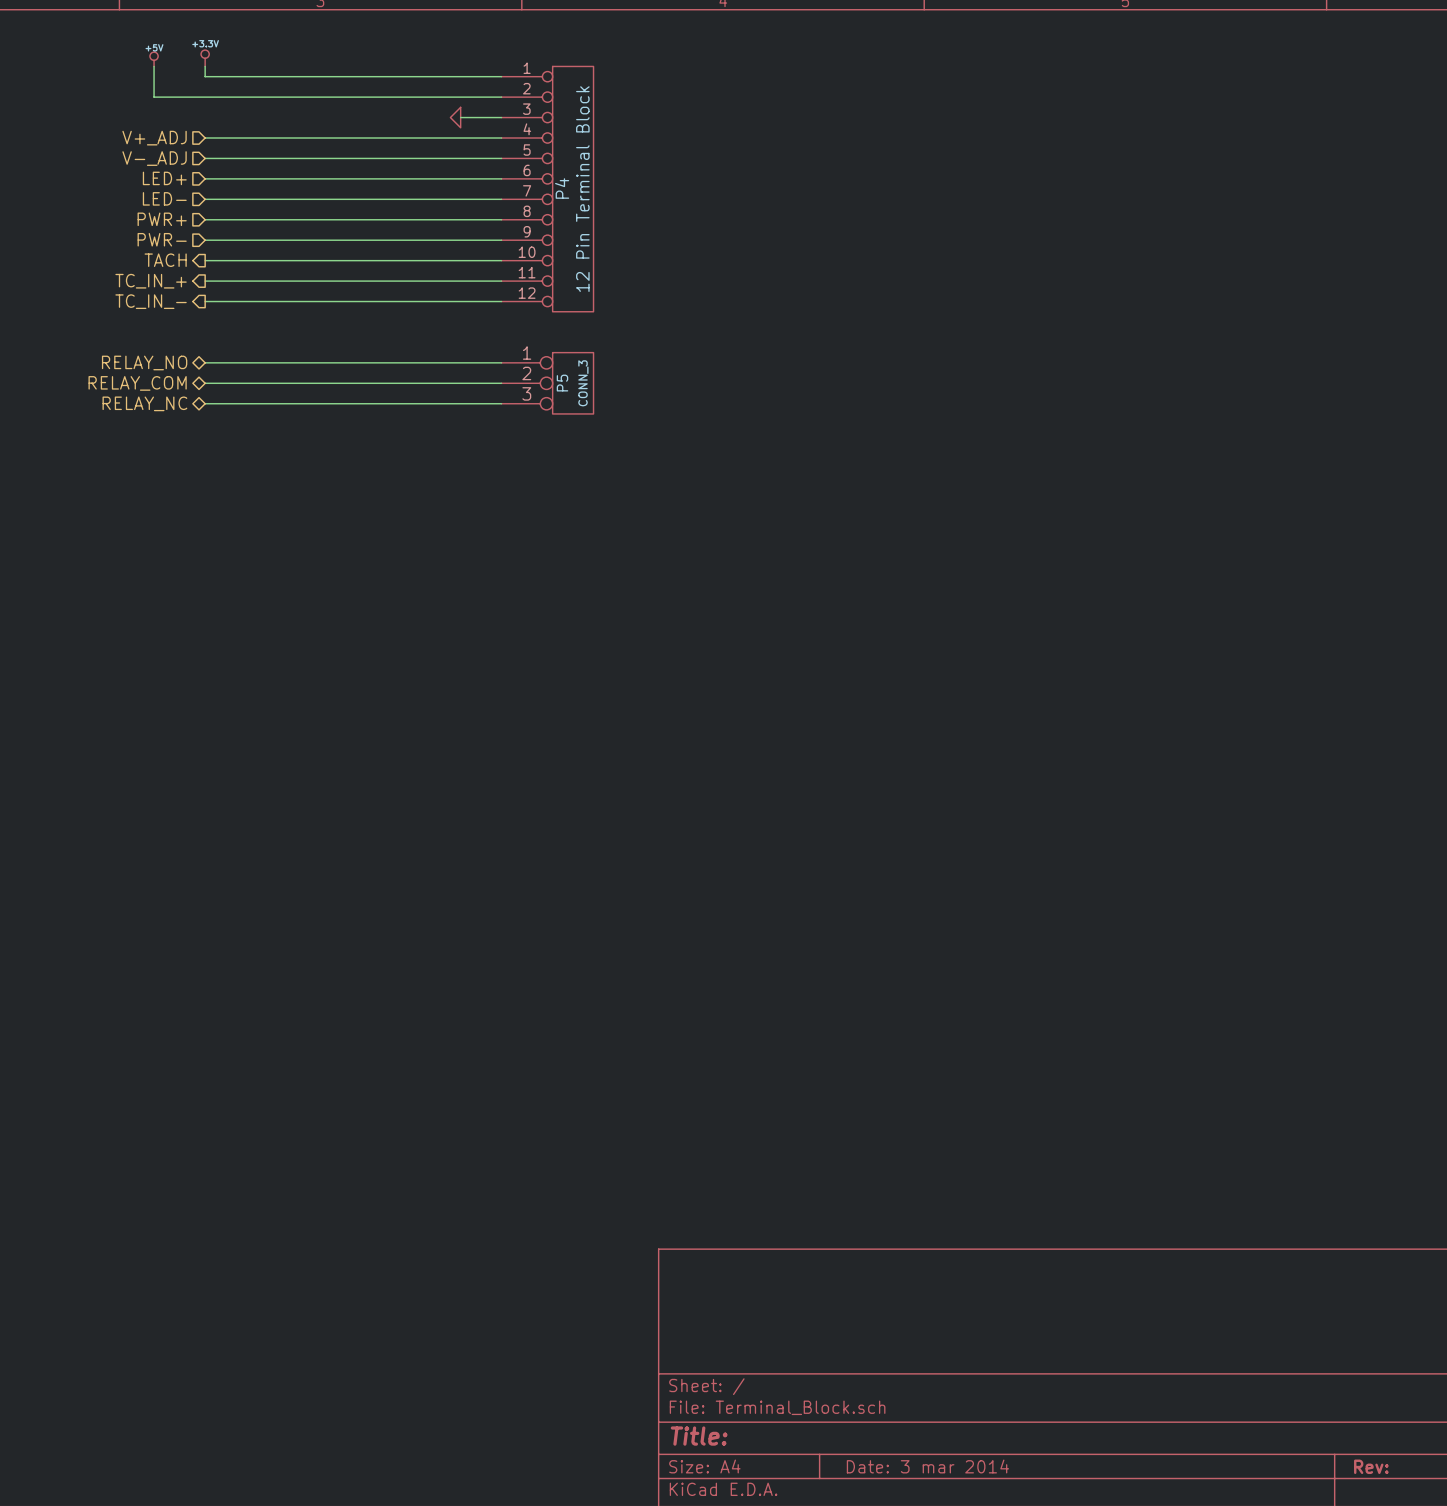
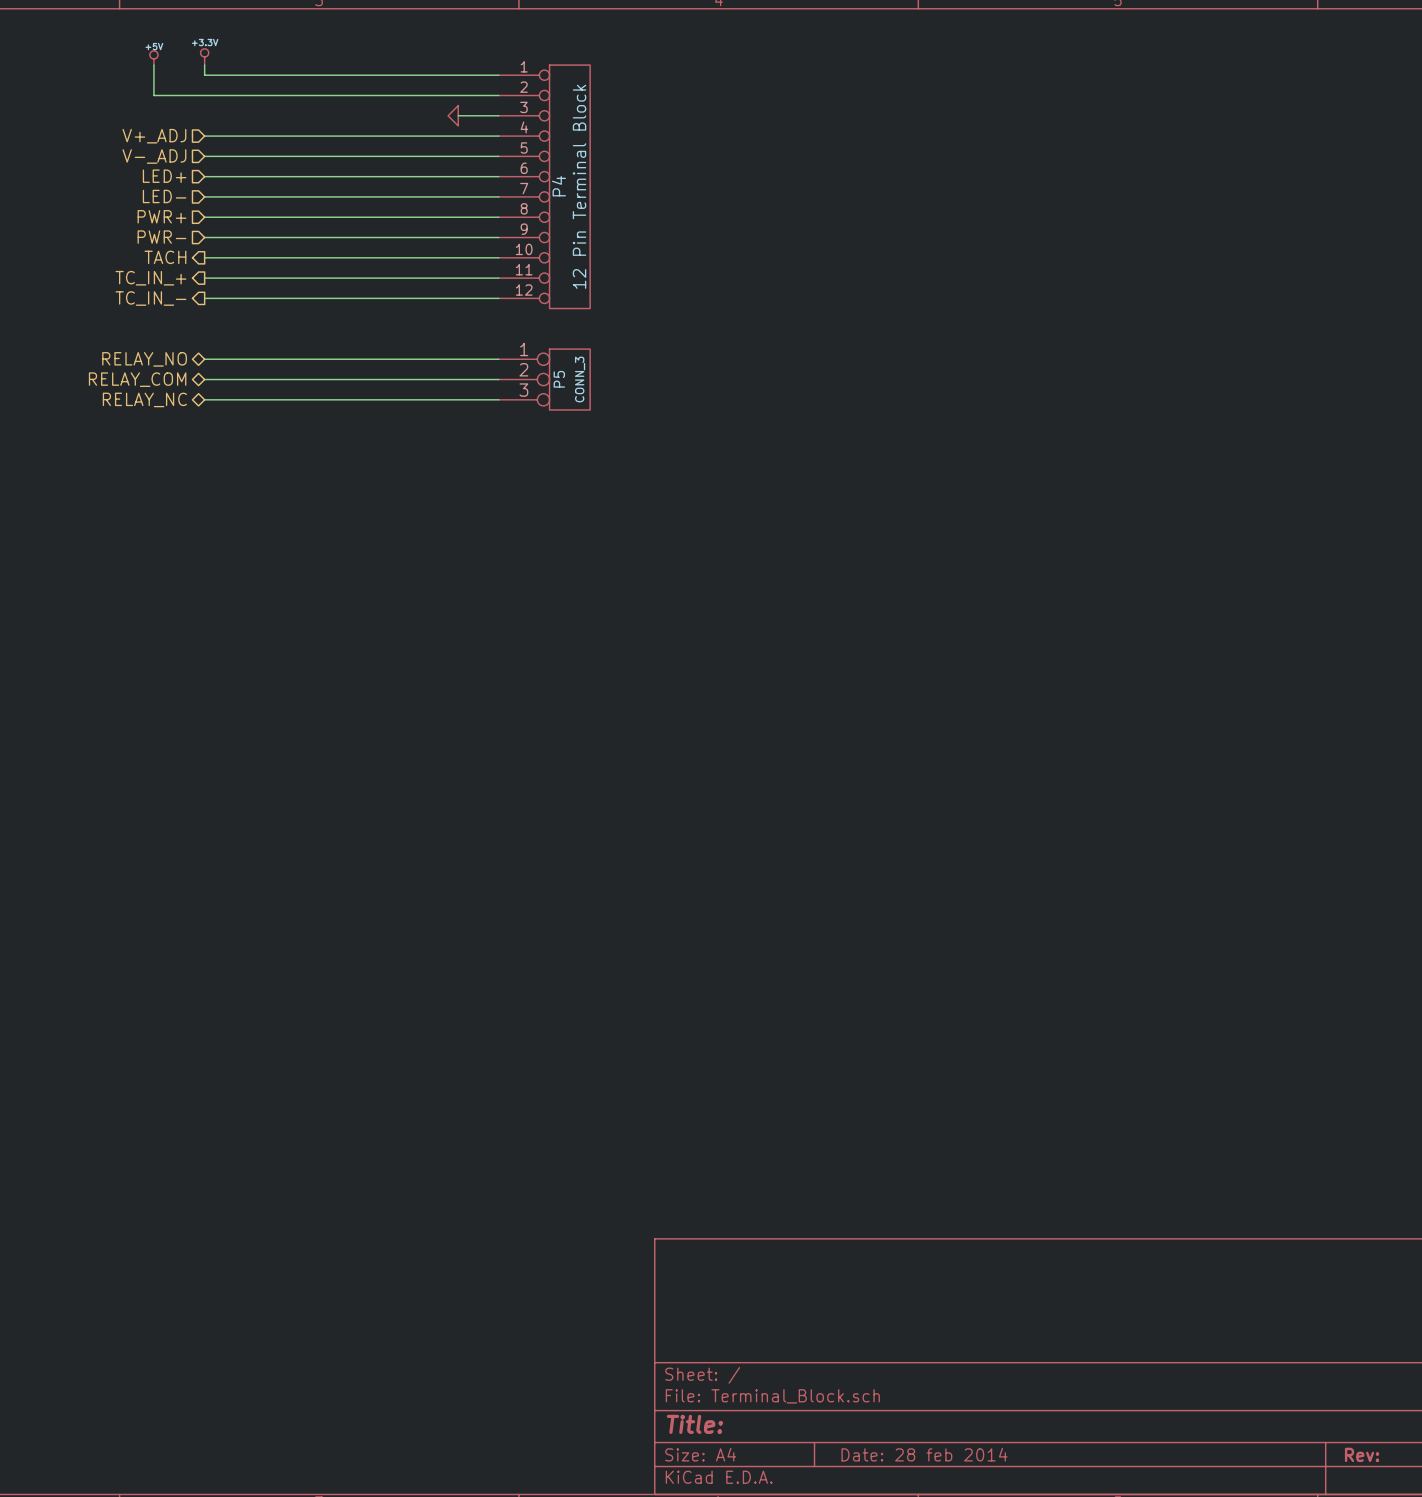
title block: Date: 3 mar 2014 (927, 1466) -> Date: 28 feb 2014 (924, 1454)

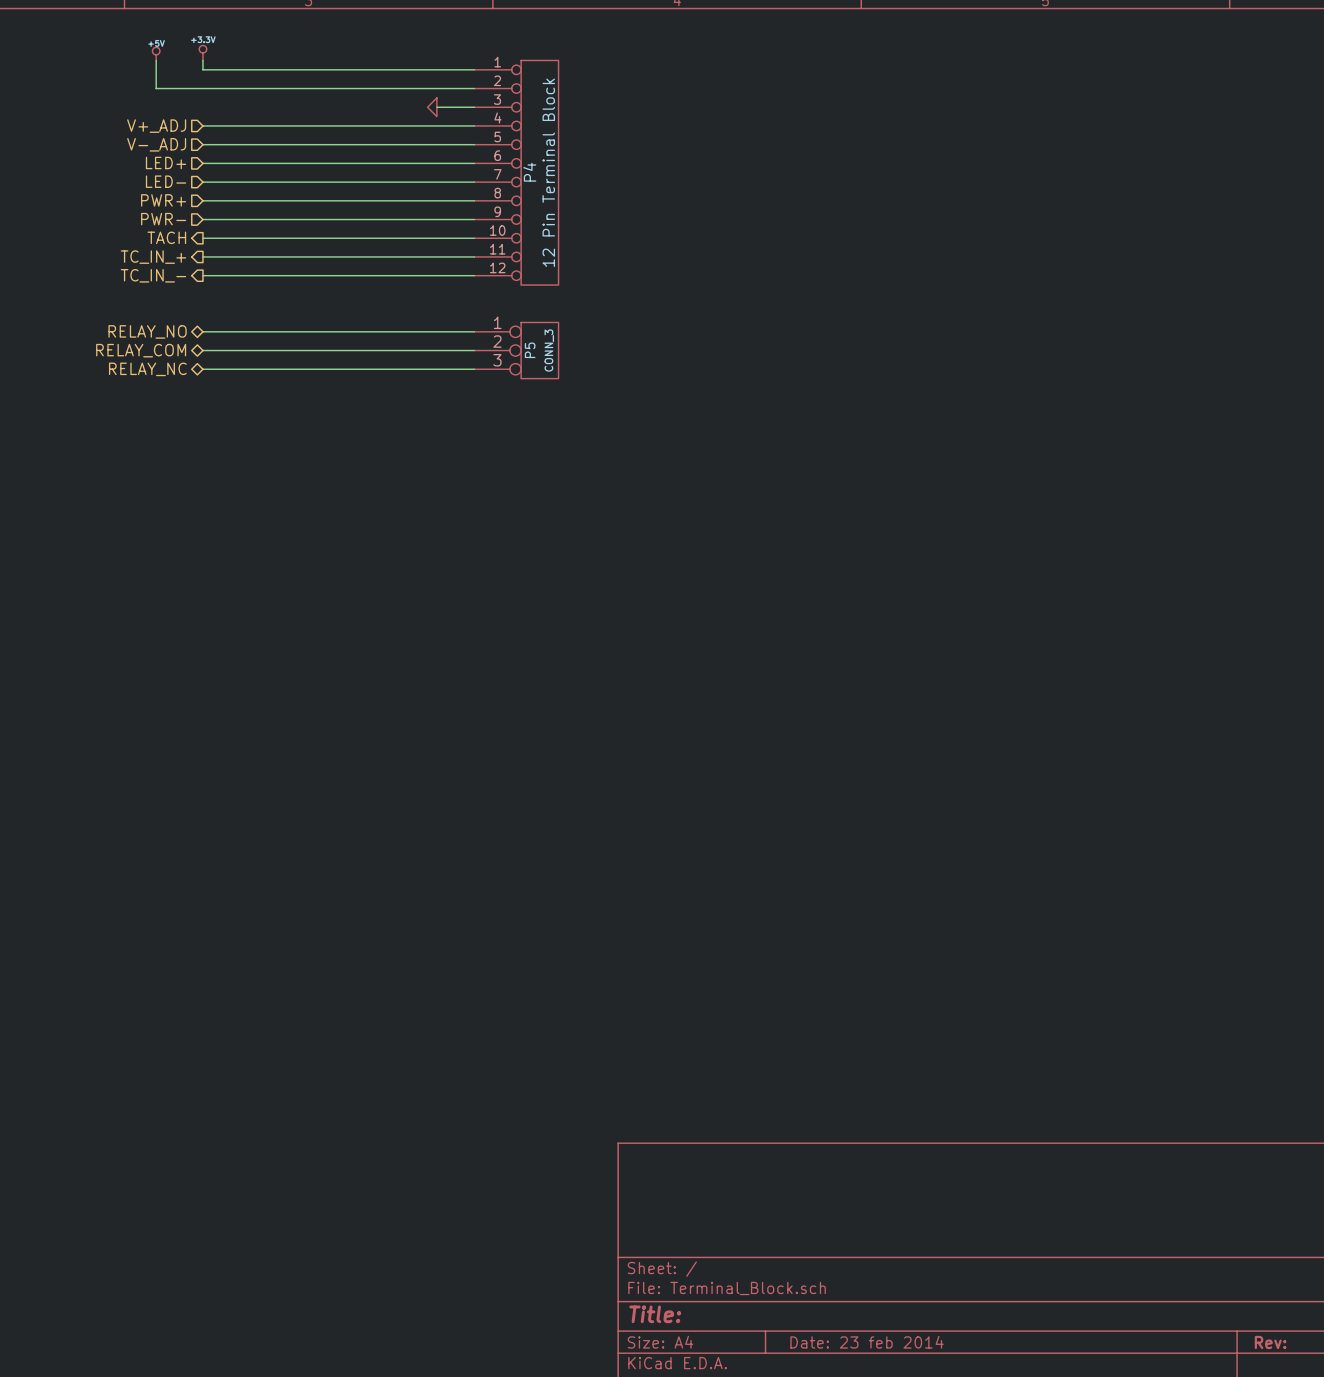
title block: Date: 28 feb 2014 (924, 1454) -> Date: 23 feb 2014 (867, 1342)

